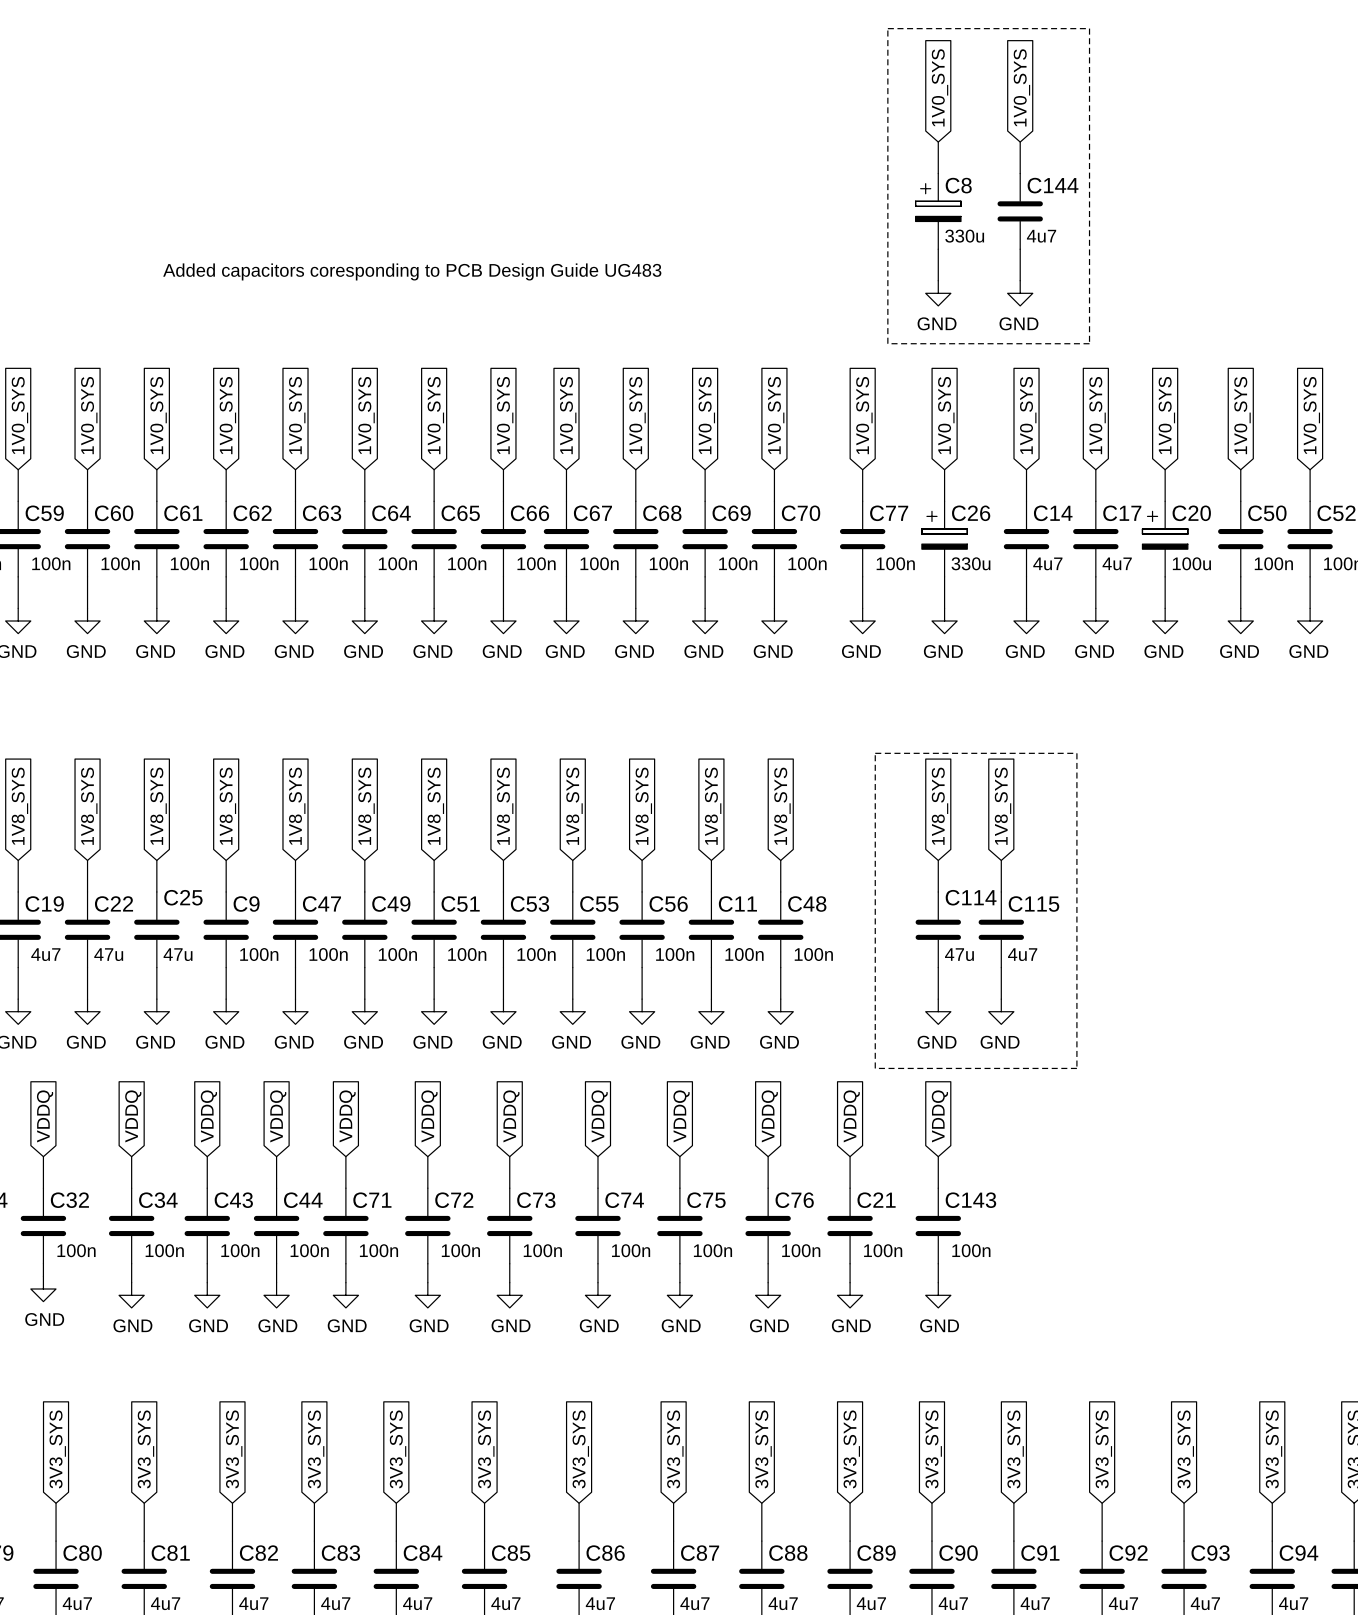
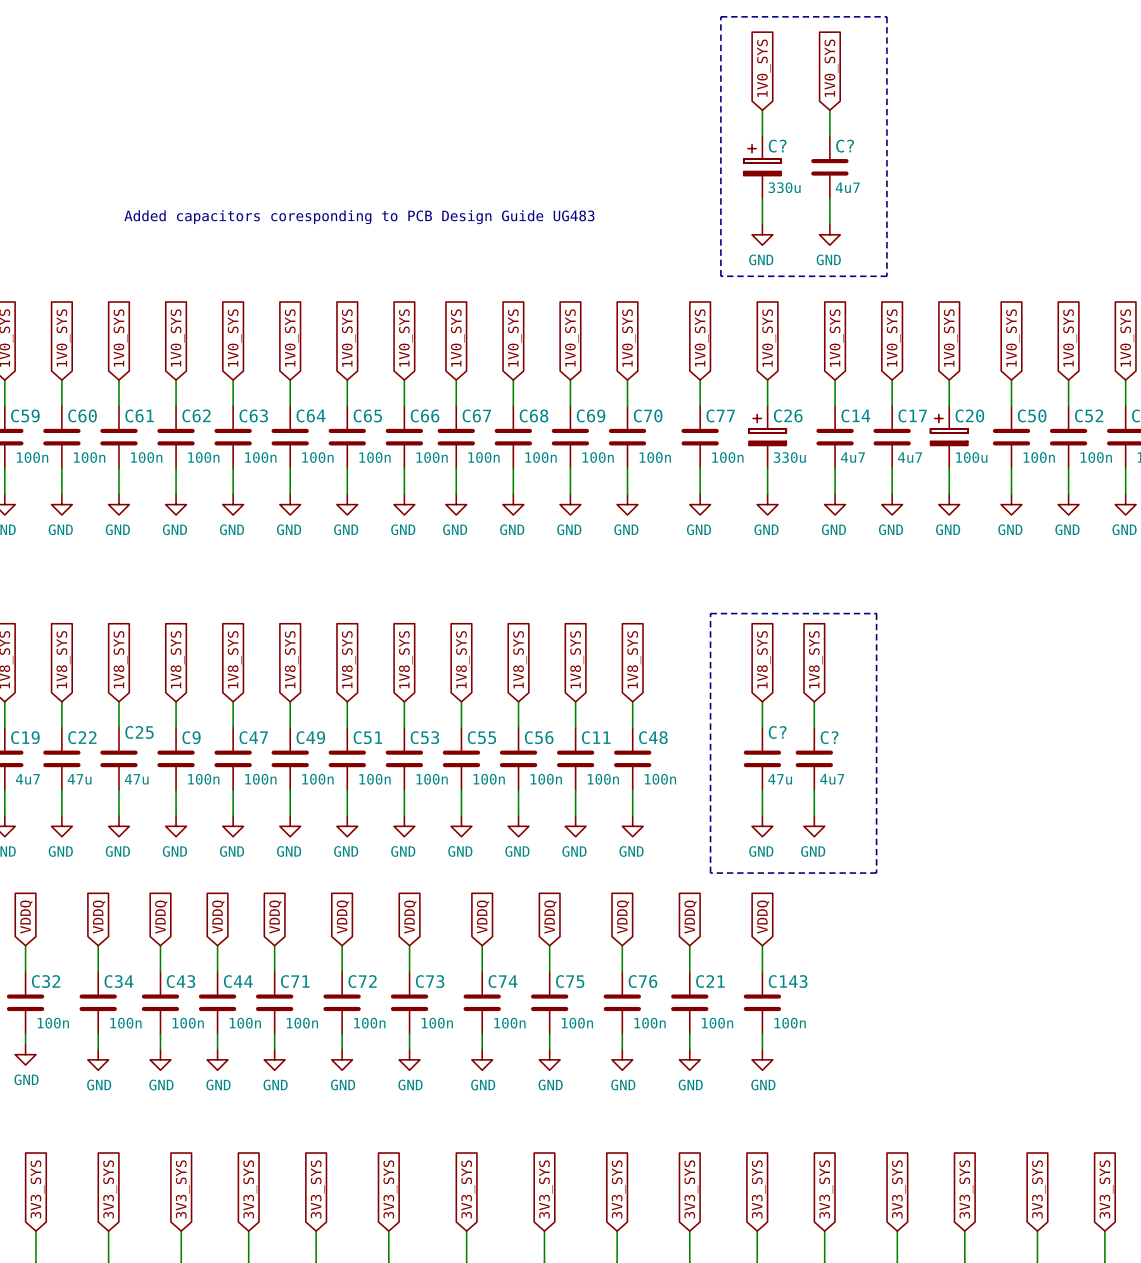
C8 name: C8 (958, 185) -> C? (777, 146)
C144 name: C144 (1053, 185) -> C? (845, 146)
C114 name: C114 (971, 897) -> C? (777, 732)
C115 name: C115 (1033, 904) -> C? (829, 737)

